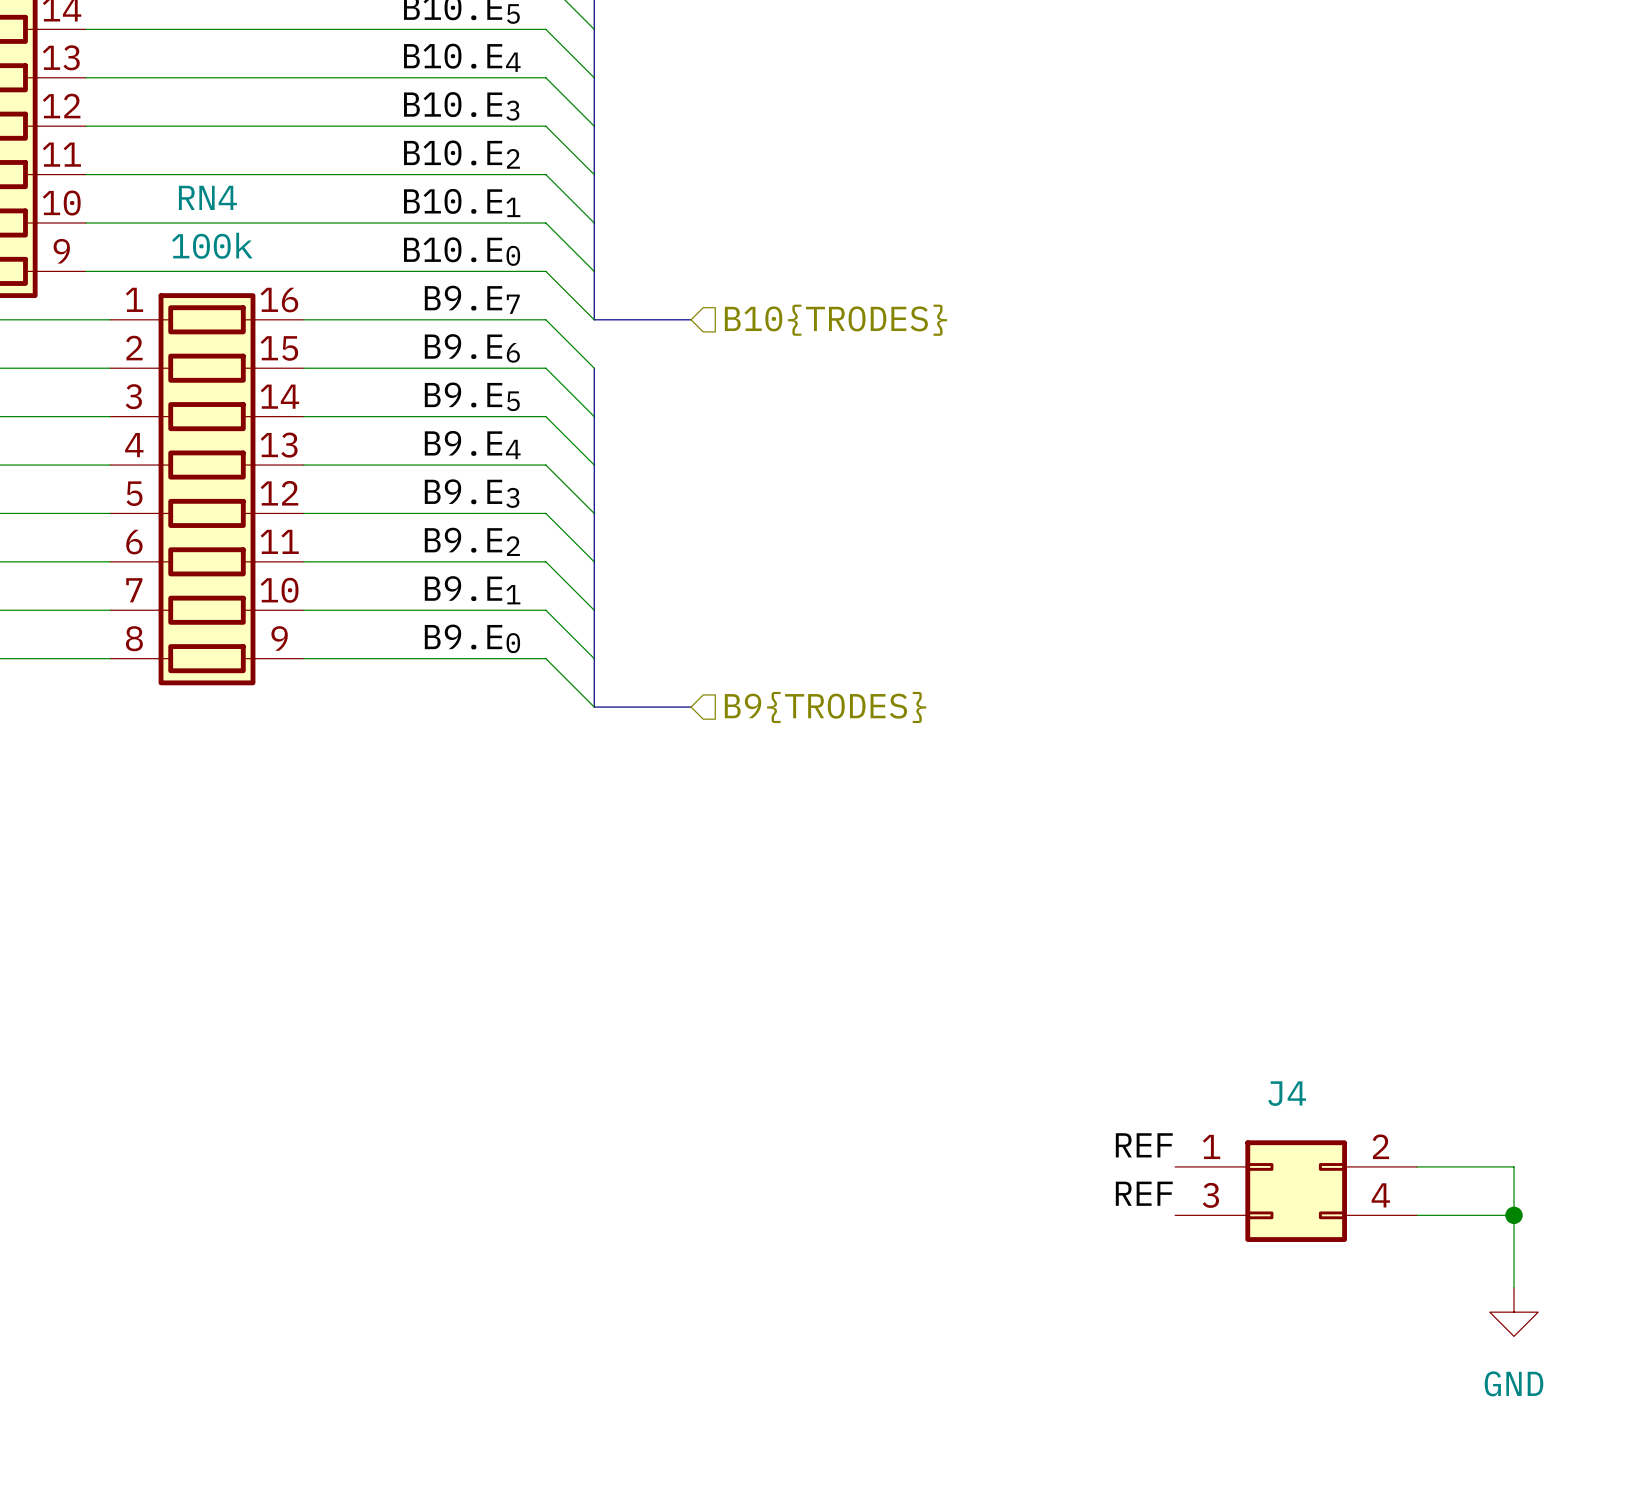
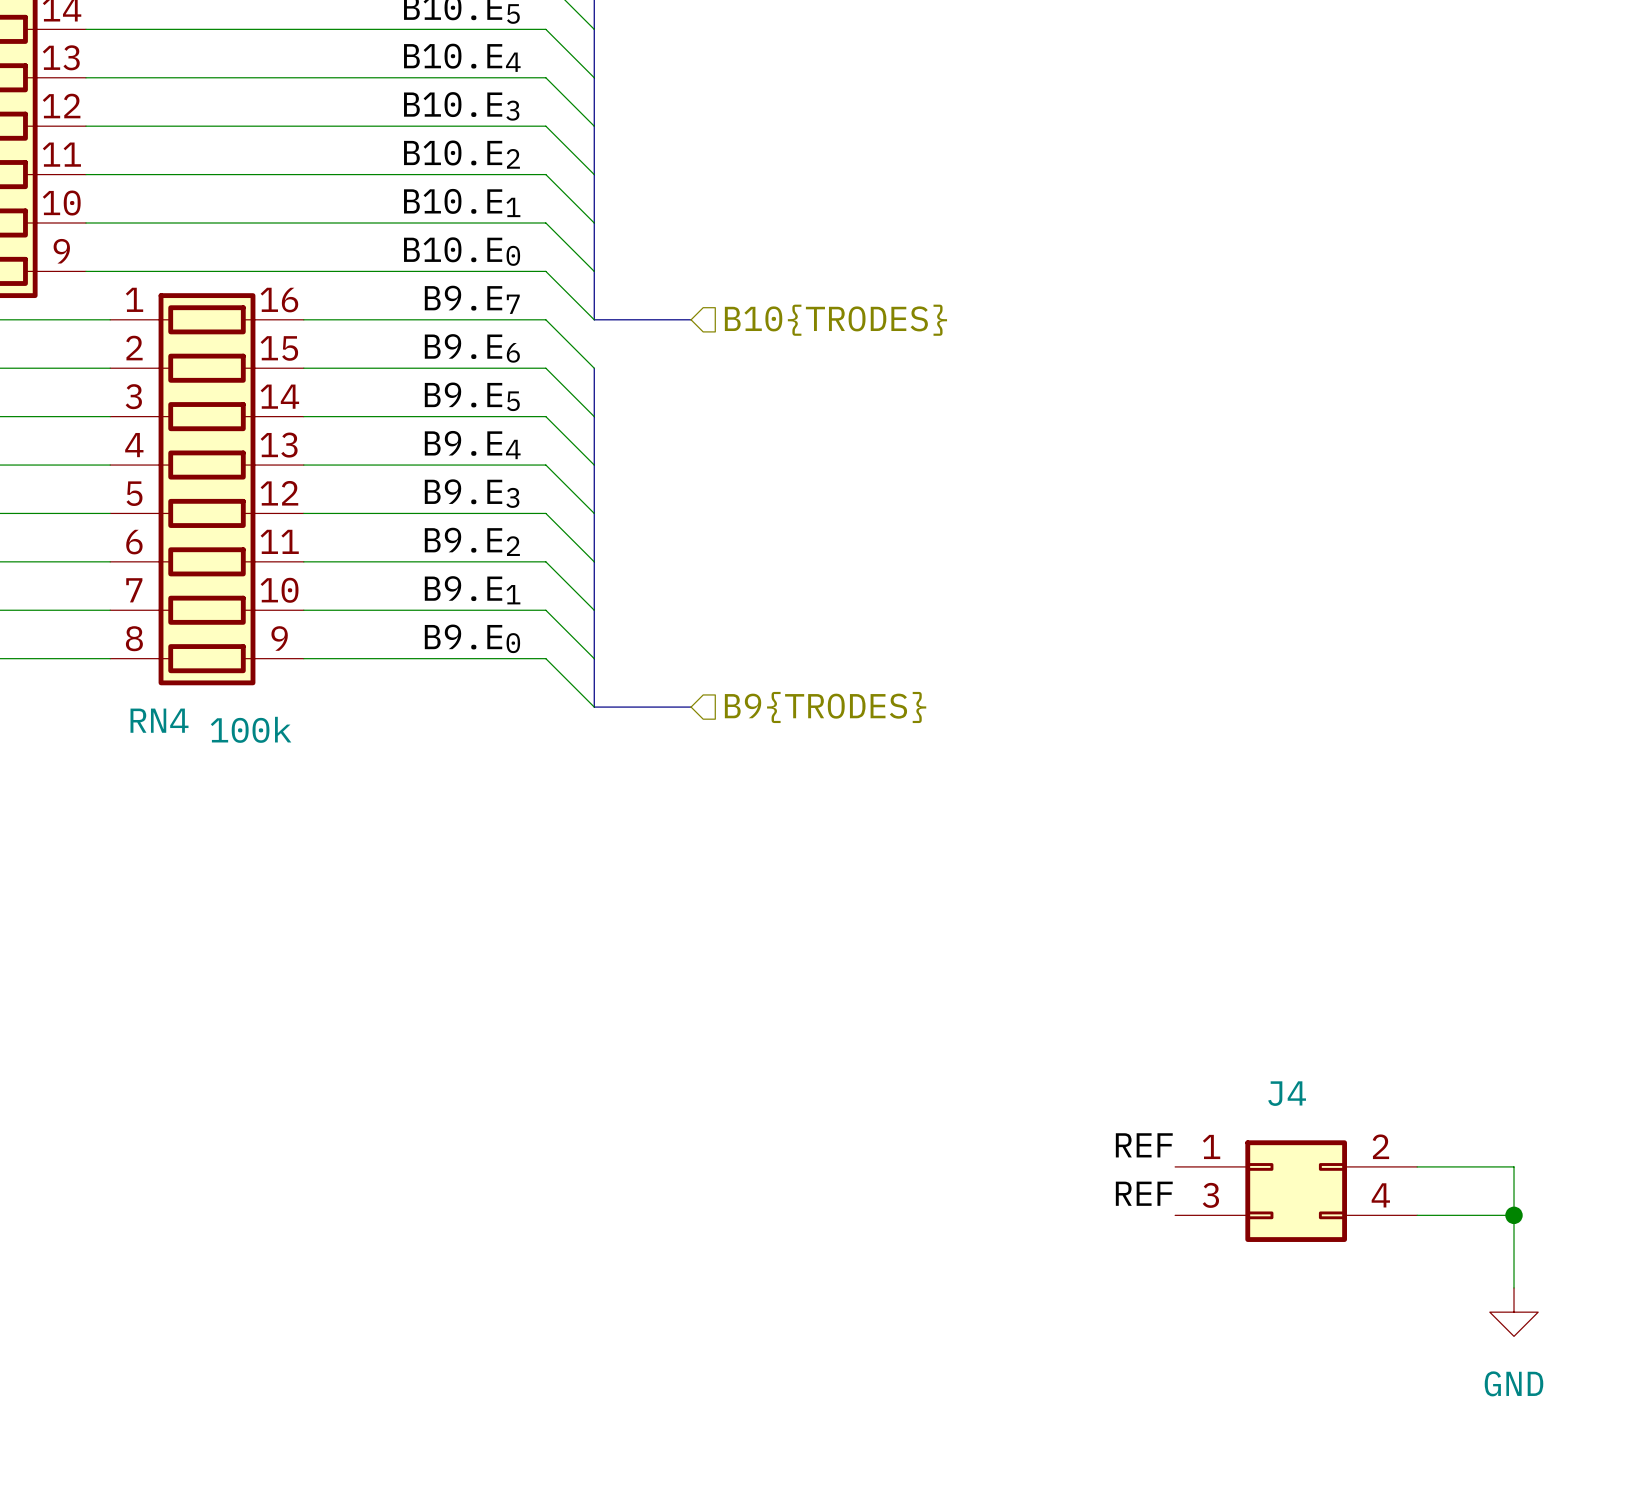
RN4 name position: RN4 (207, 197) -> RN4 (159, 720)
RN4 value position: 100k (212, 245) -> 100k (251, 729)

